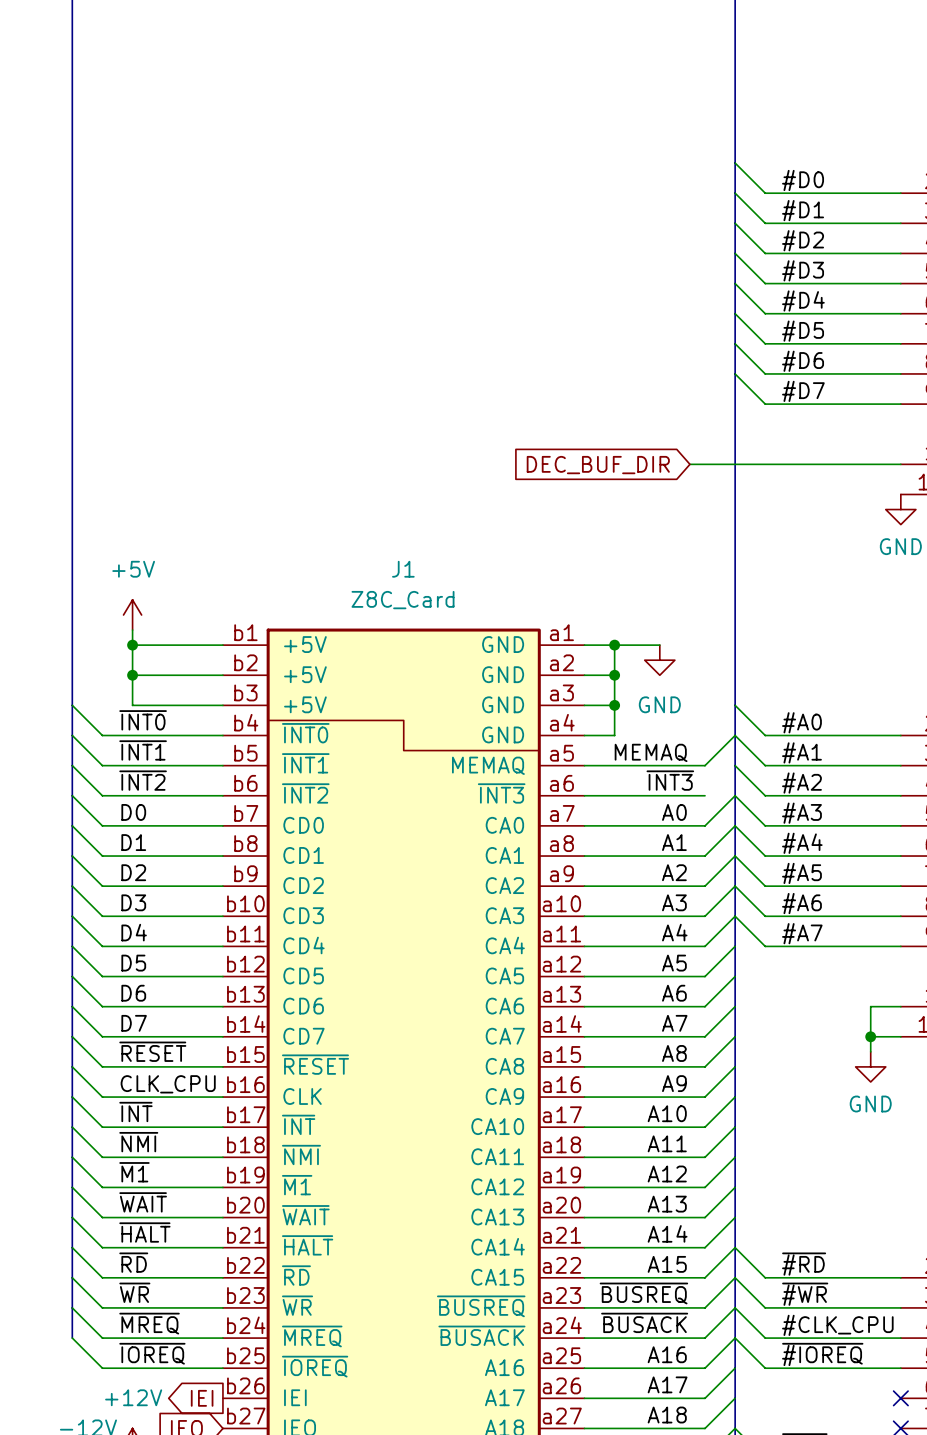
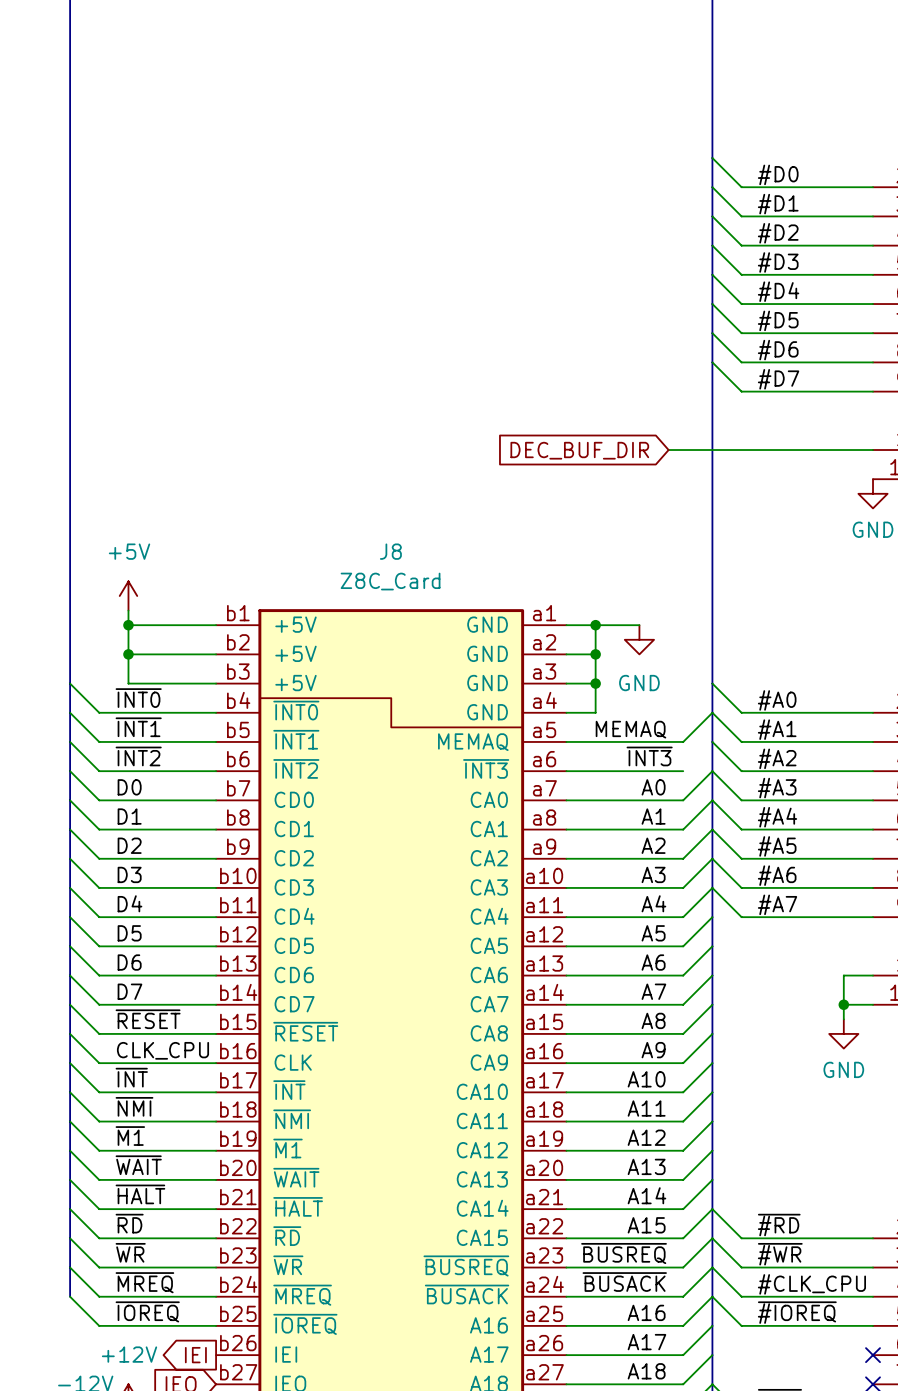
J1 name: J1 (403, 569) -> J8 (390, 551)

